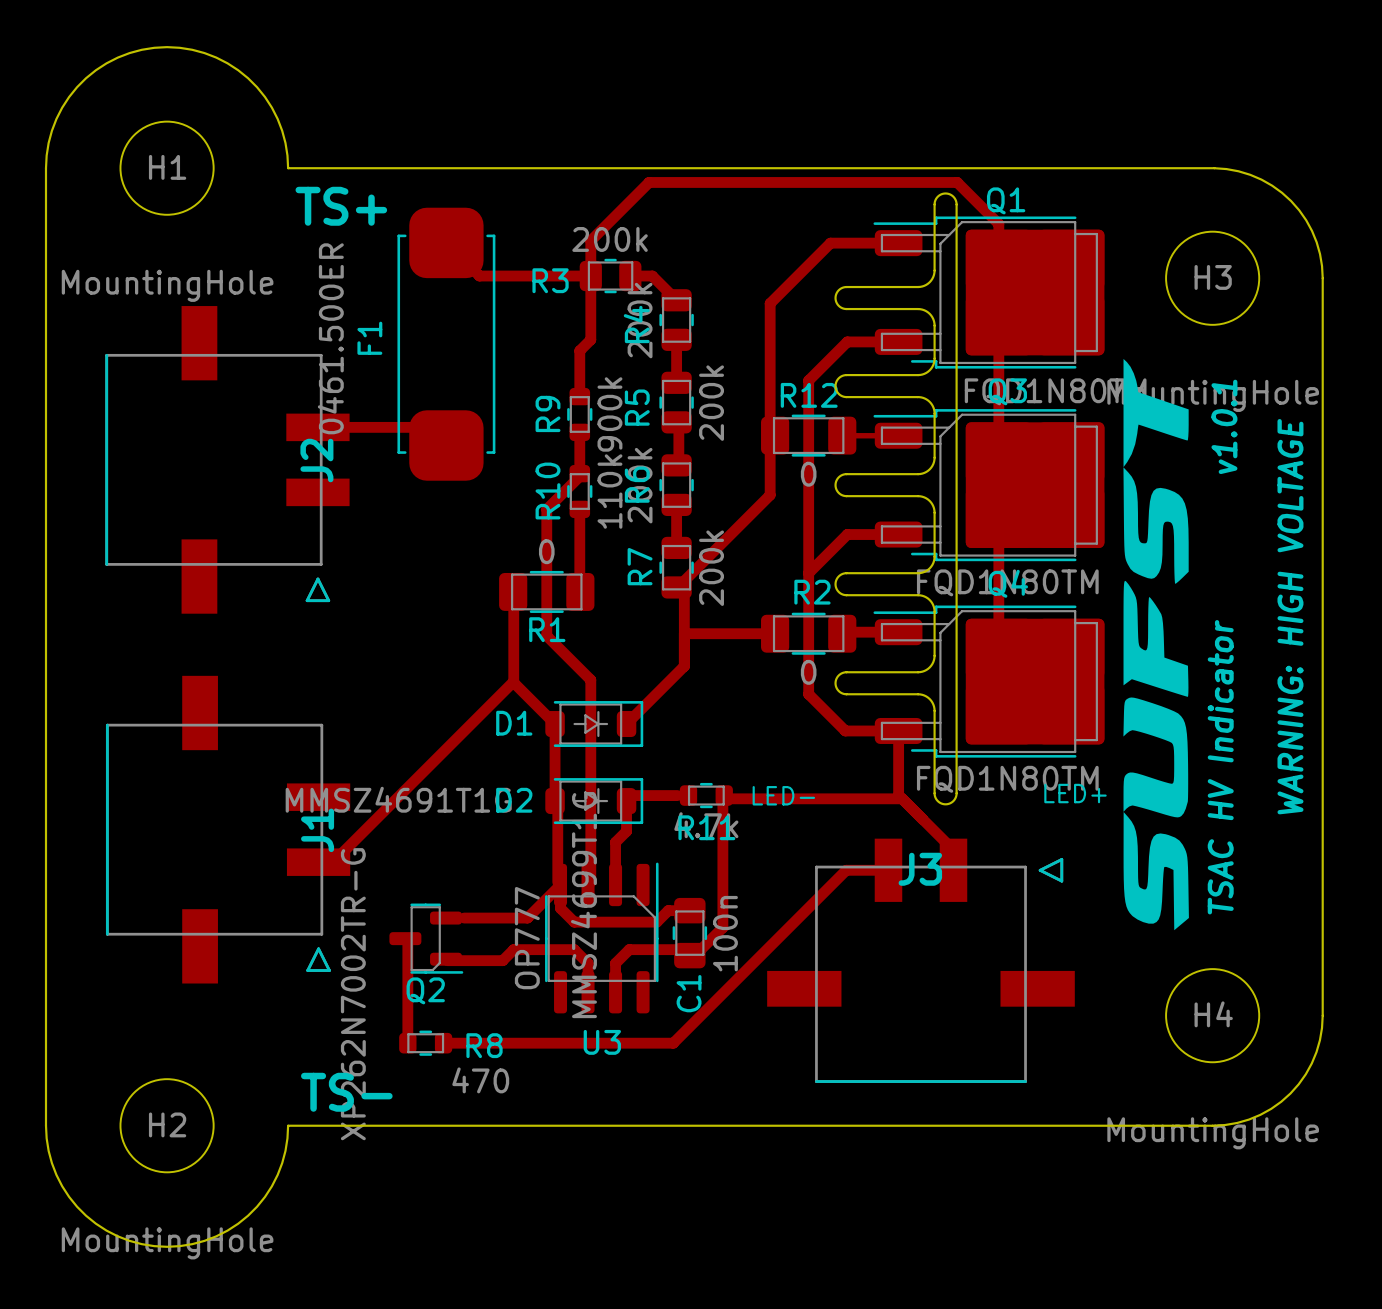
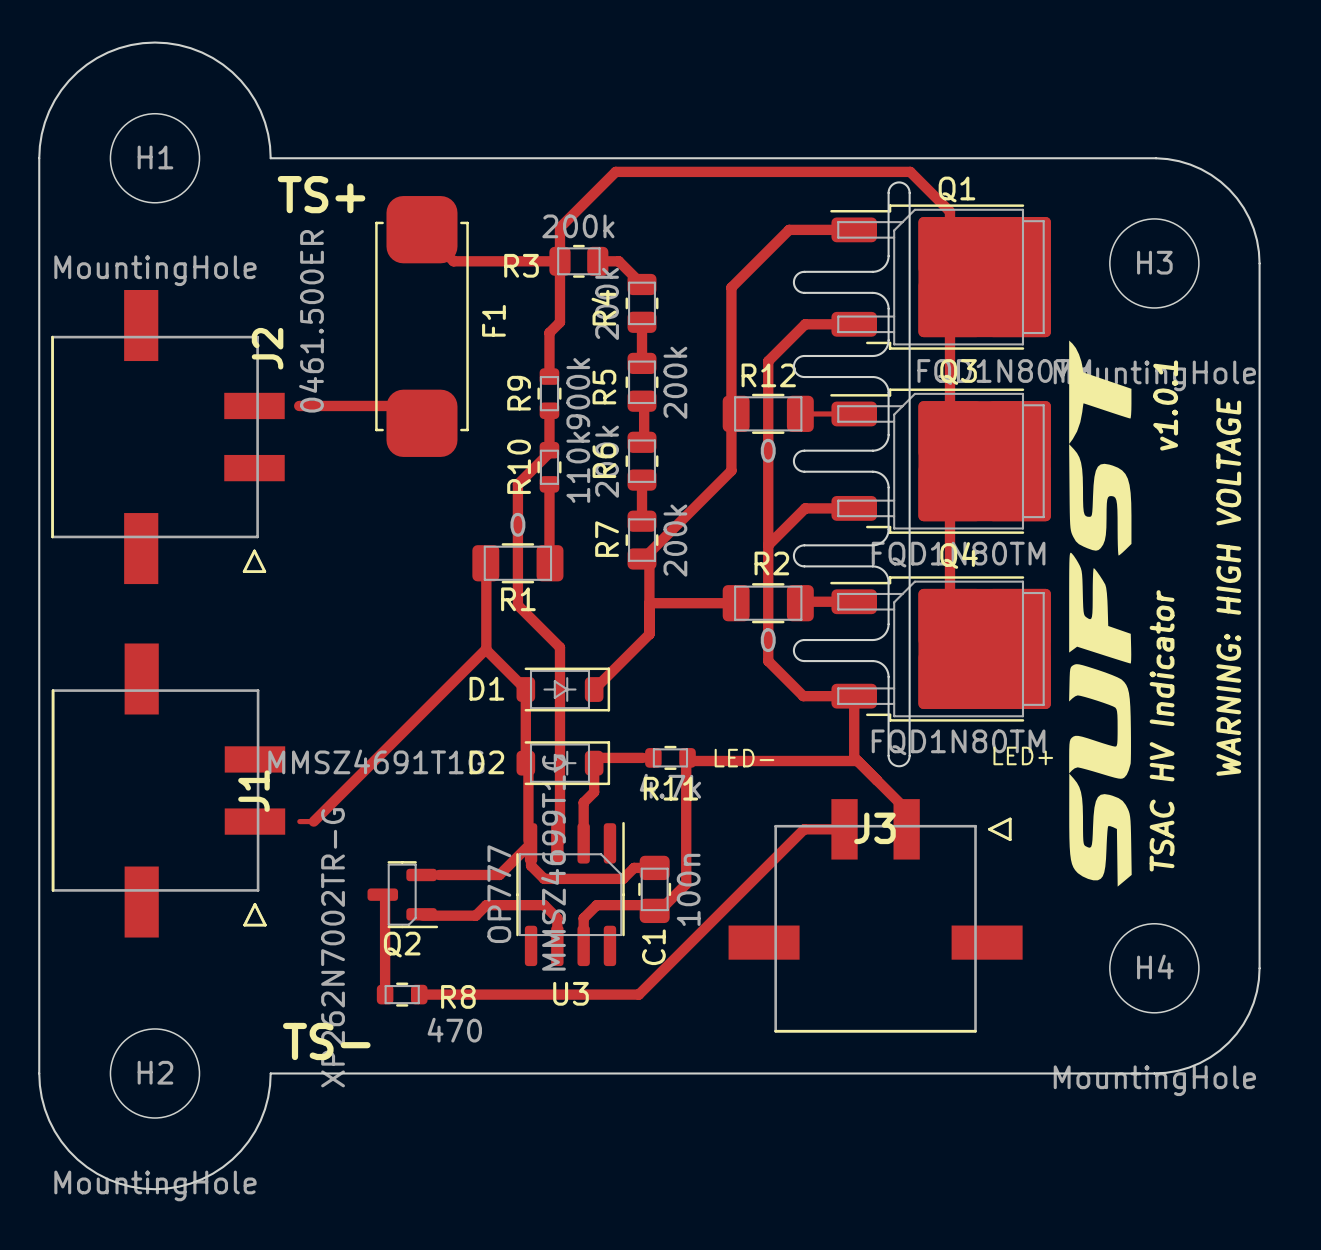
F1 name position: F1 (369, 338) -> F1 (493, 320)
J2 position: (227, 459) -> (167, 437)
J2 name position: J2 (316, 460) -> J2 (267, 348)
J1 position: (228, 829) -> (168, 790)

